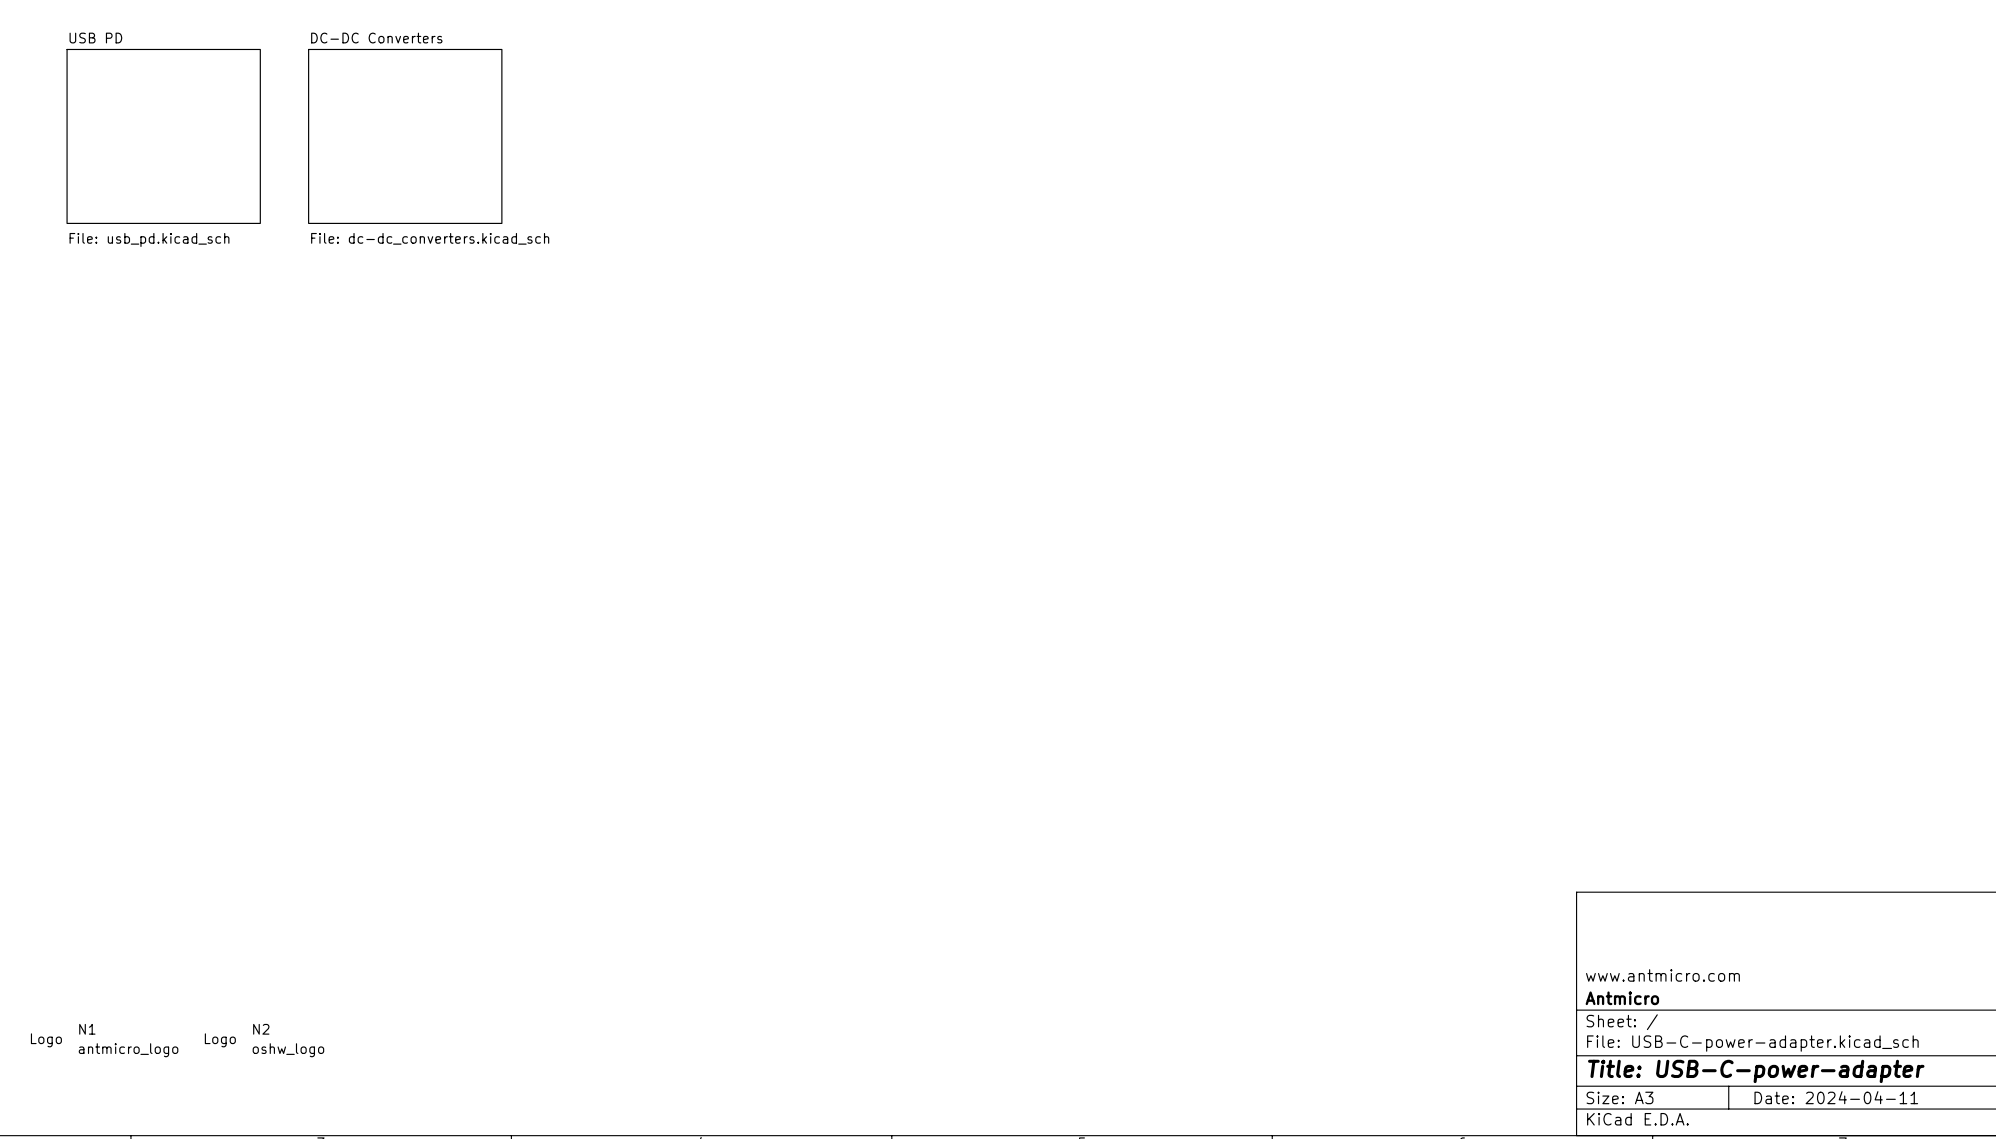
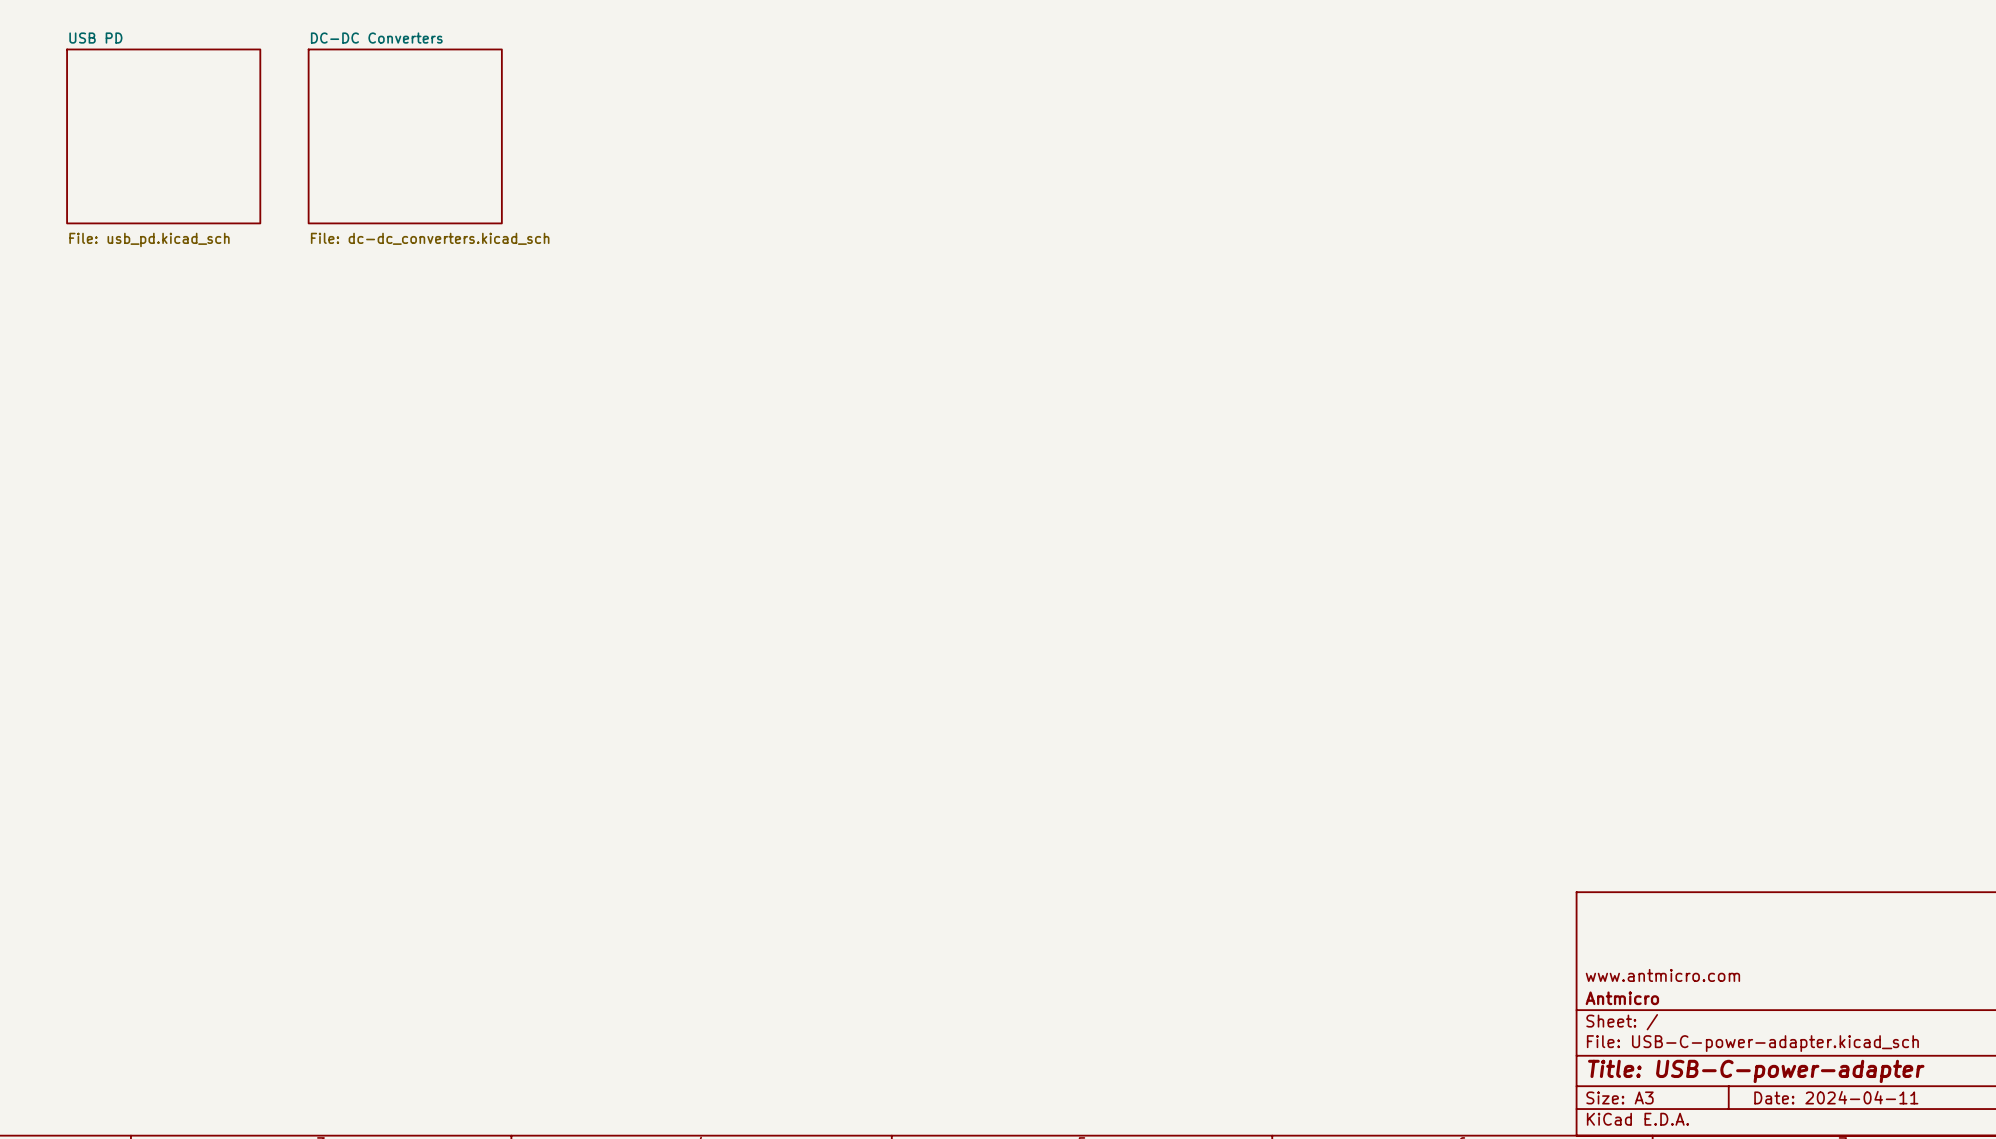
N1: antmicro_logo (104, 1040) -> none
N2: oshw_logo (264, 1040) -> none

